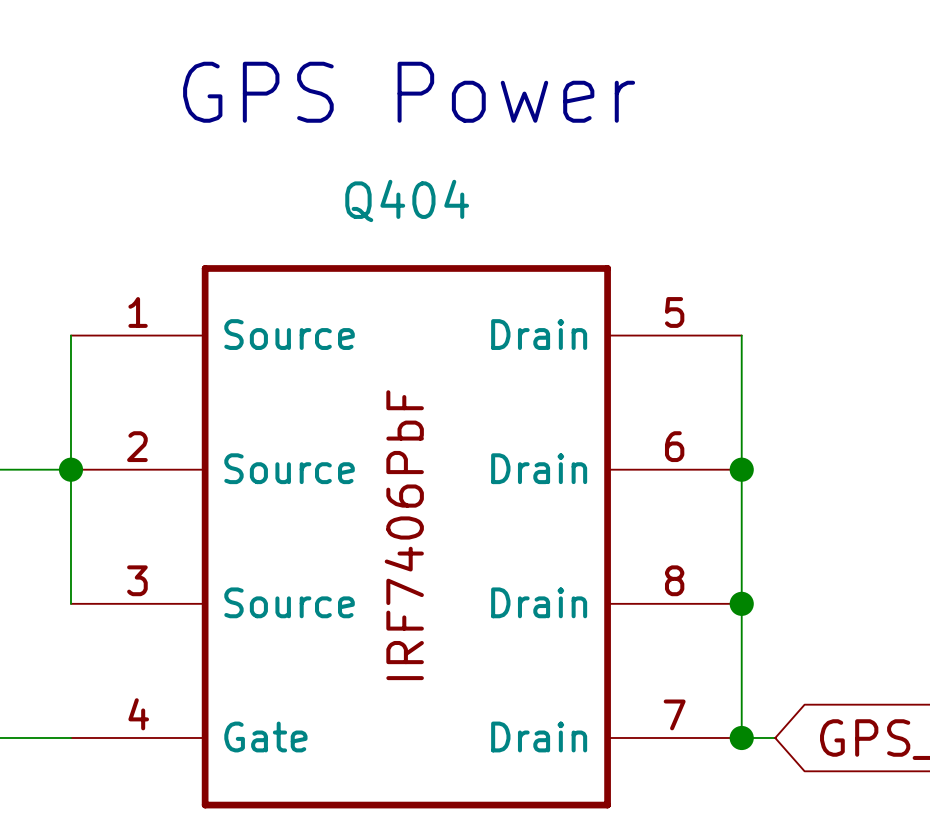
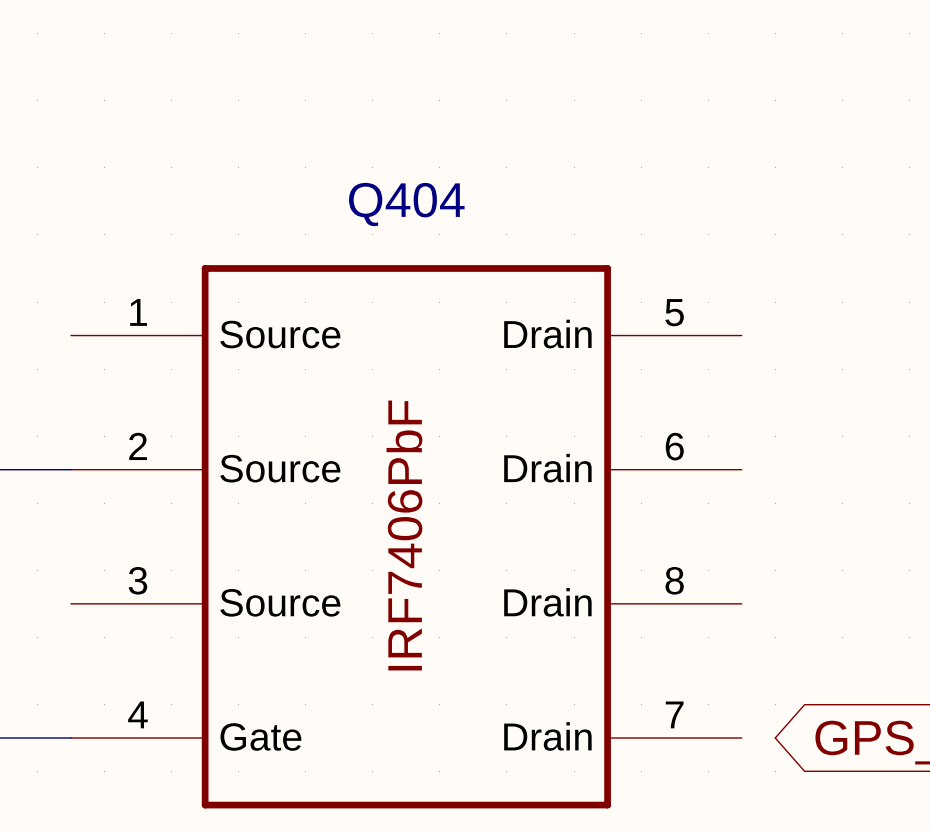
text: GPS Power (409, 92) -> none
wire: (70, 335) (70, 603) -> none
wire: (741, 335) (741, 737) (775, 737) -> none
junction: (70, 469) -> none
junction: (741, 469) -> none
junction: (741, 603) -> none
junction: (741, 737) -> none

